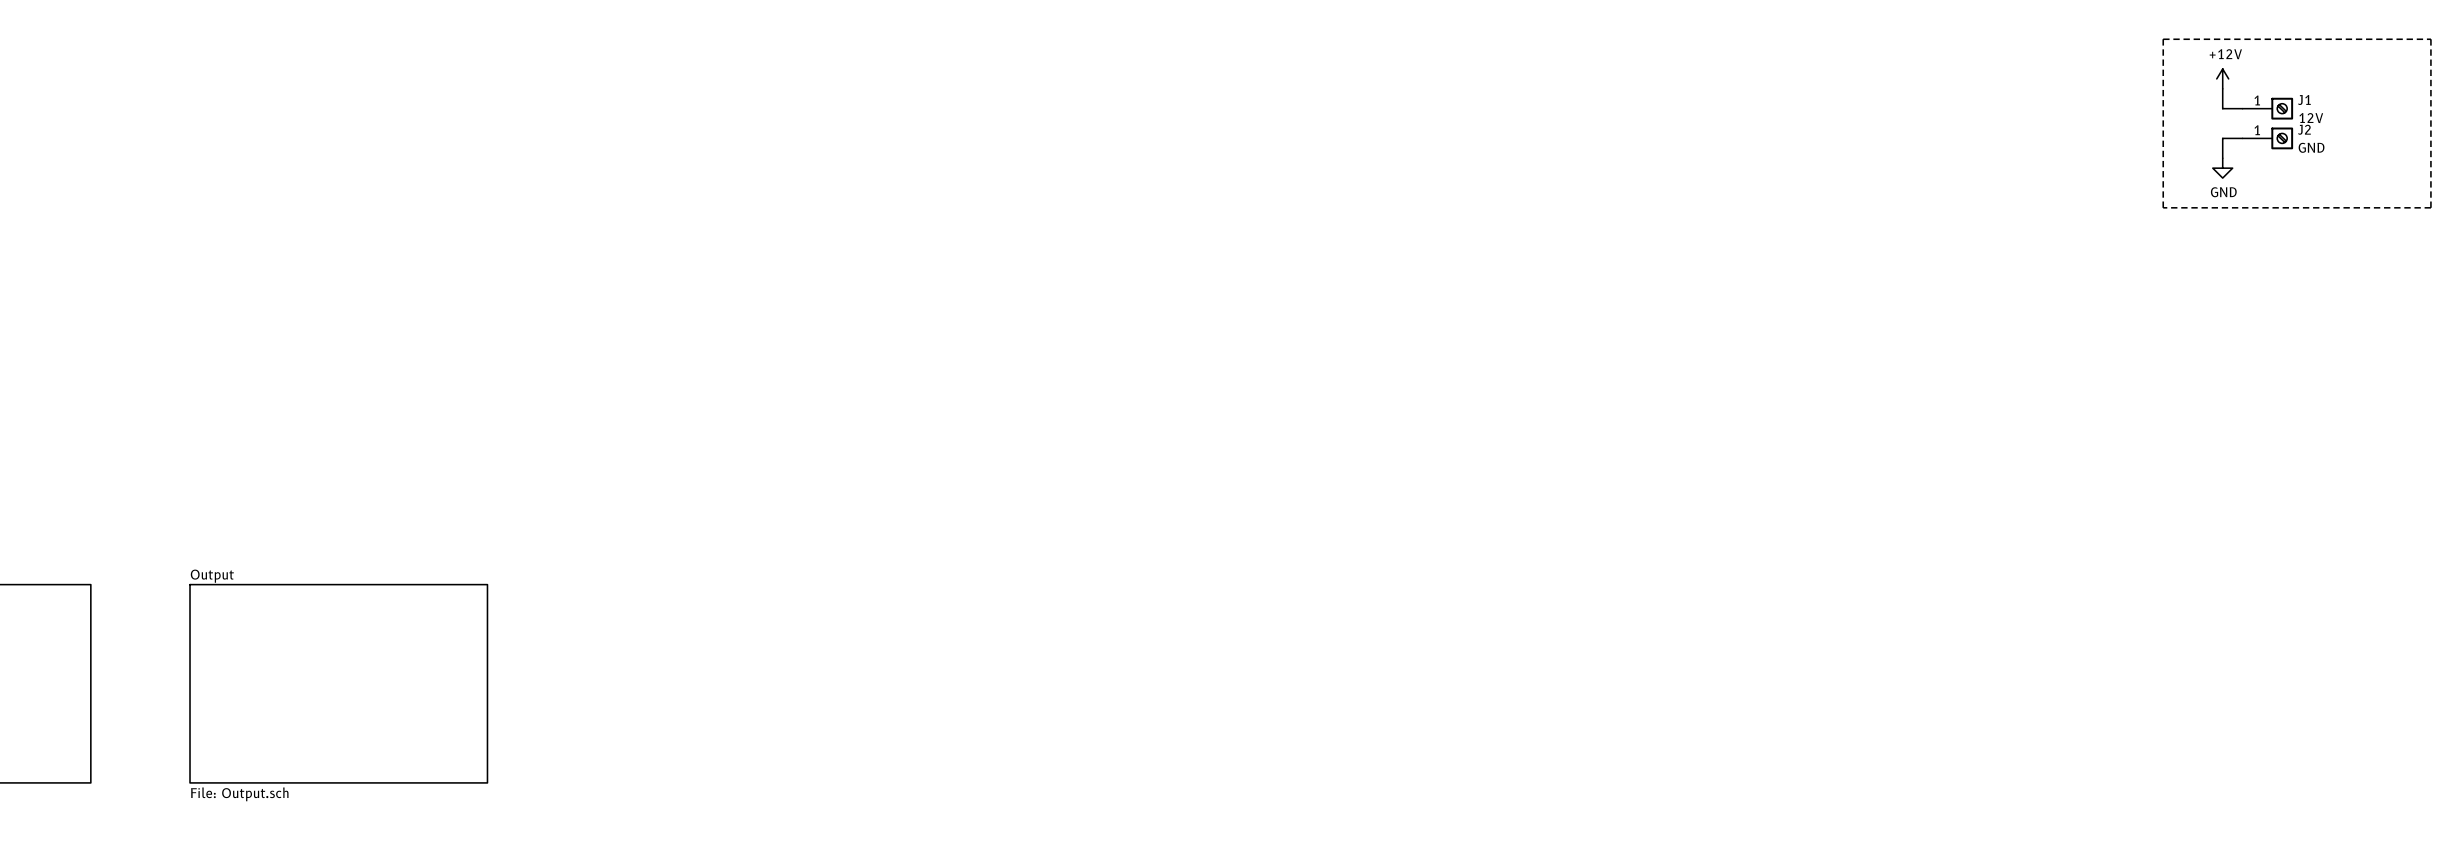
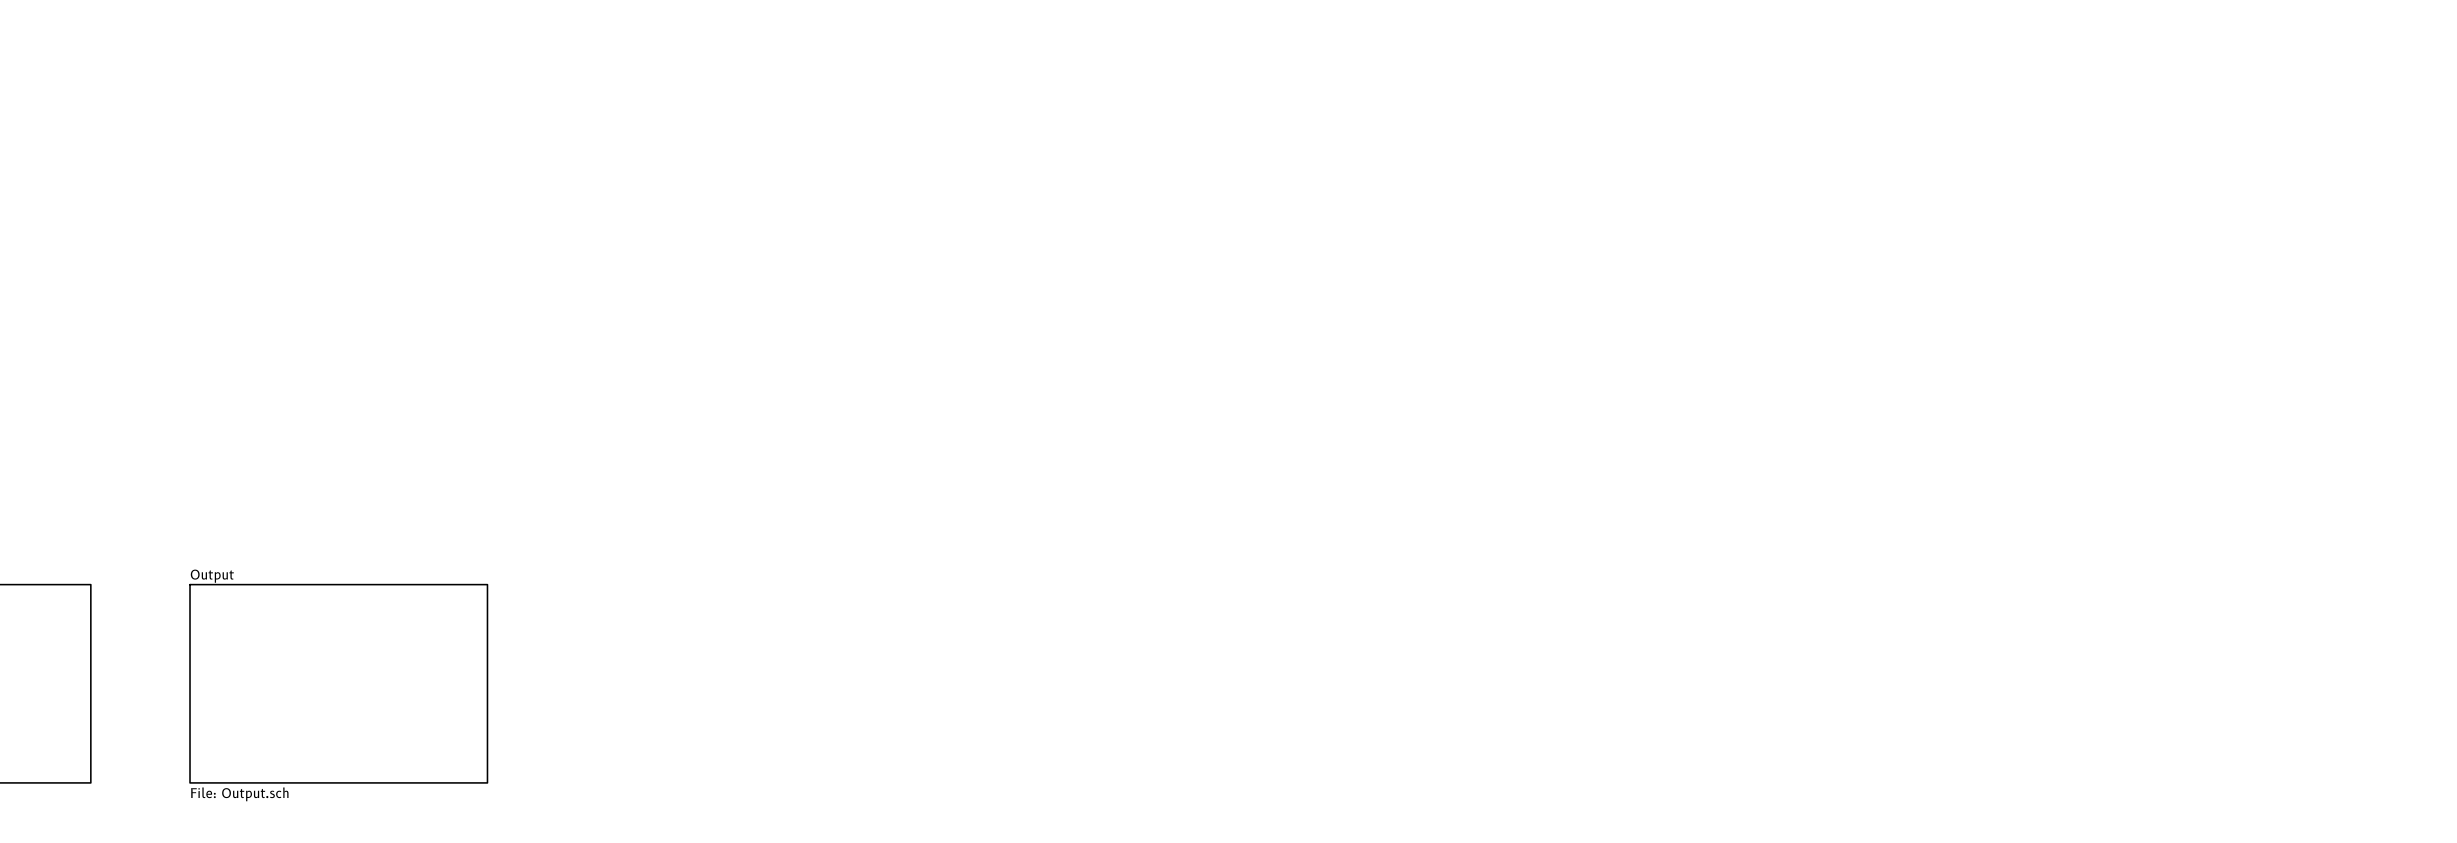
line: (2163, 39) (2430, 39) (2430, 207) (2163, 207) (2163, 39) -> none
power symbol: +12V (2222, 78) -> none
wire: (2222, 88) (2222, 108) (2242, 108) -> none
J1: 12V (2267, 108) -> none
wire: (2242, 138) (2222, 138) (2222, 158) -> none
J2: GND (2267, 138) -> none
power symbol: GND (2222, 168) -> none

